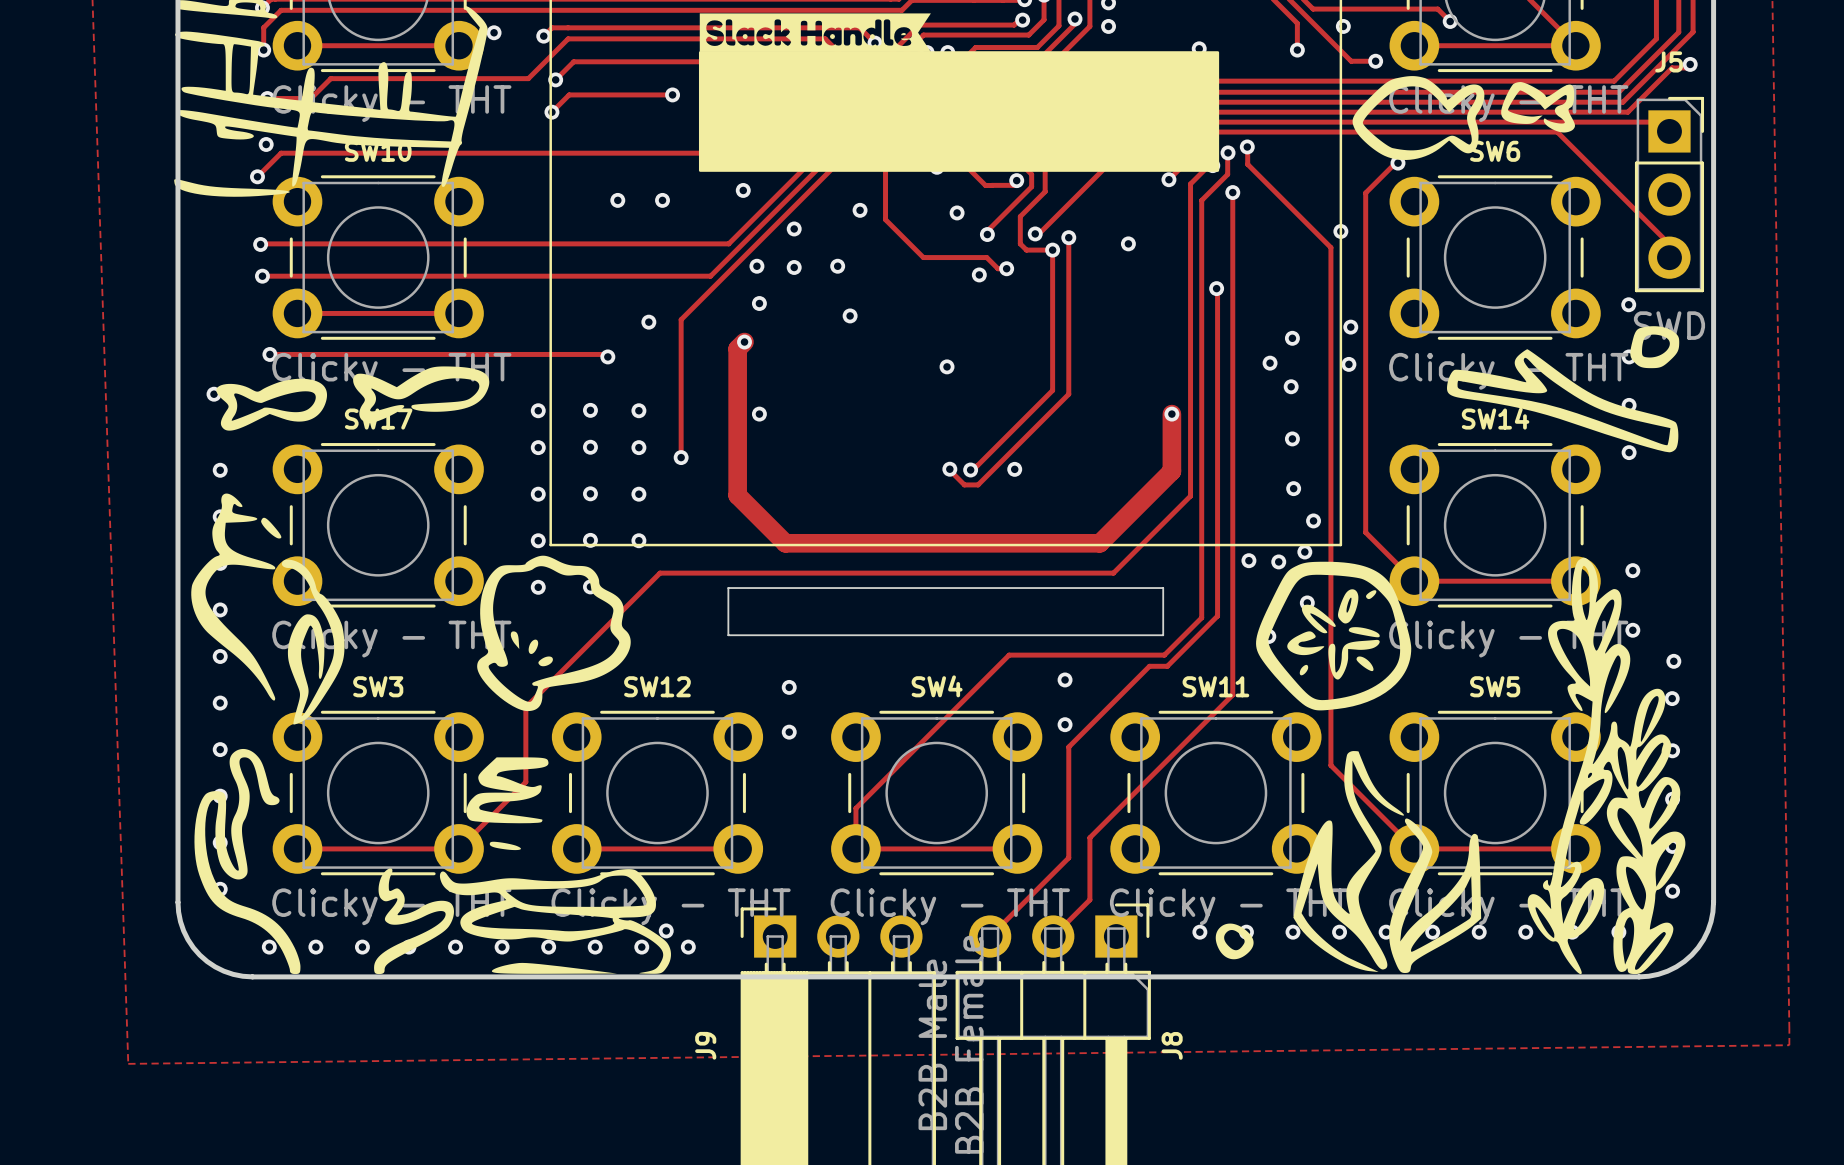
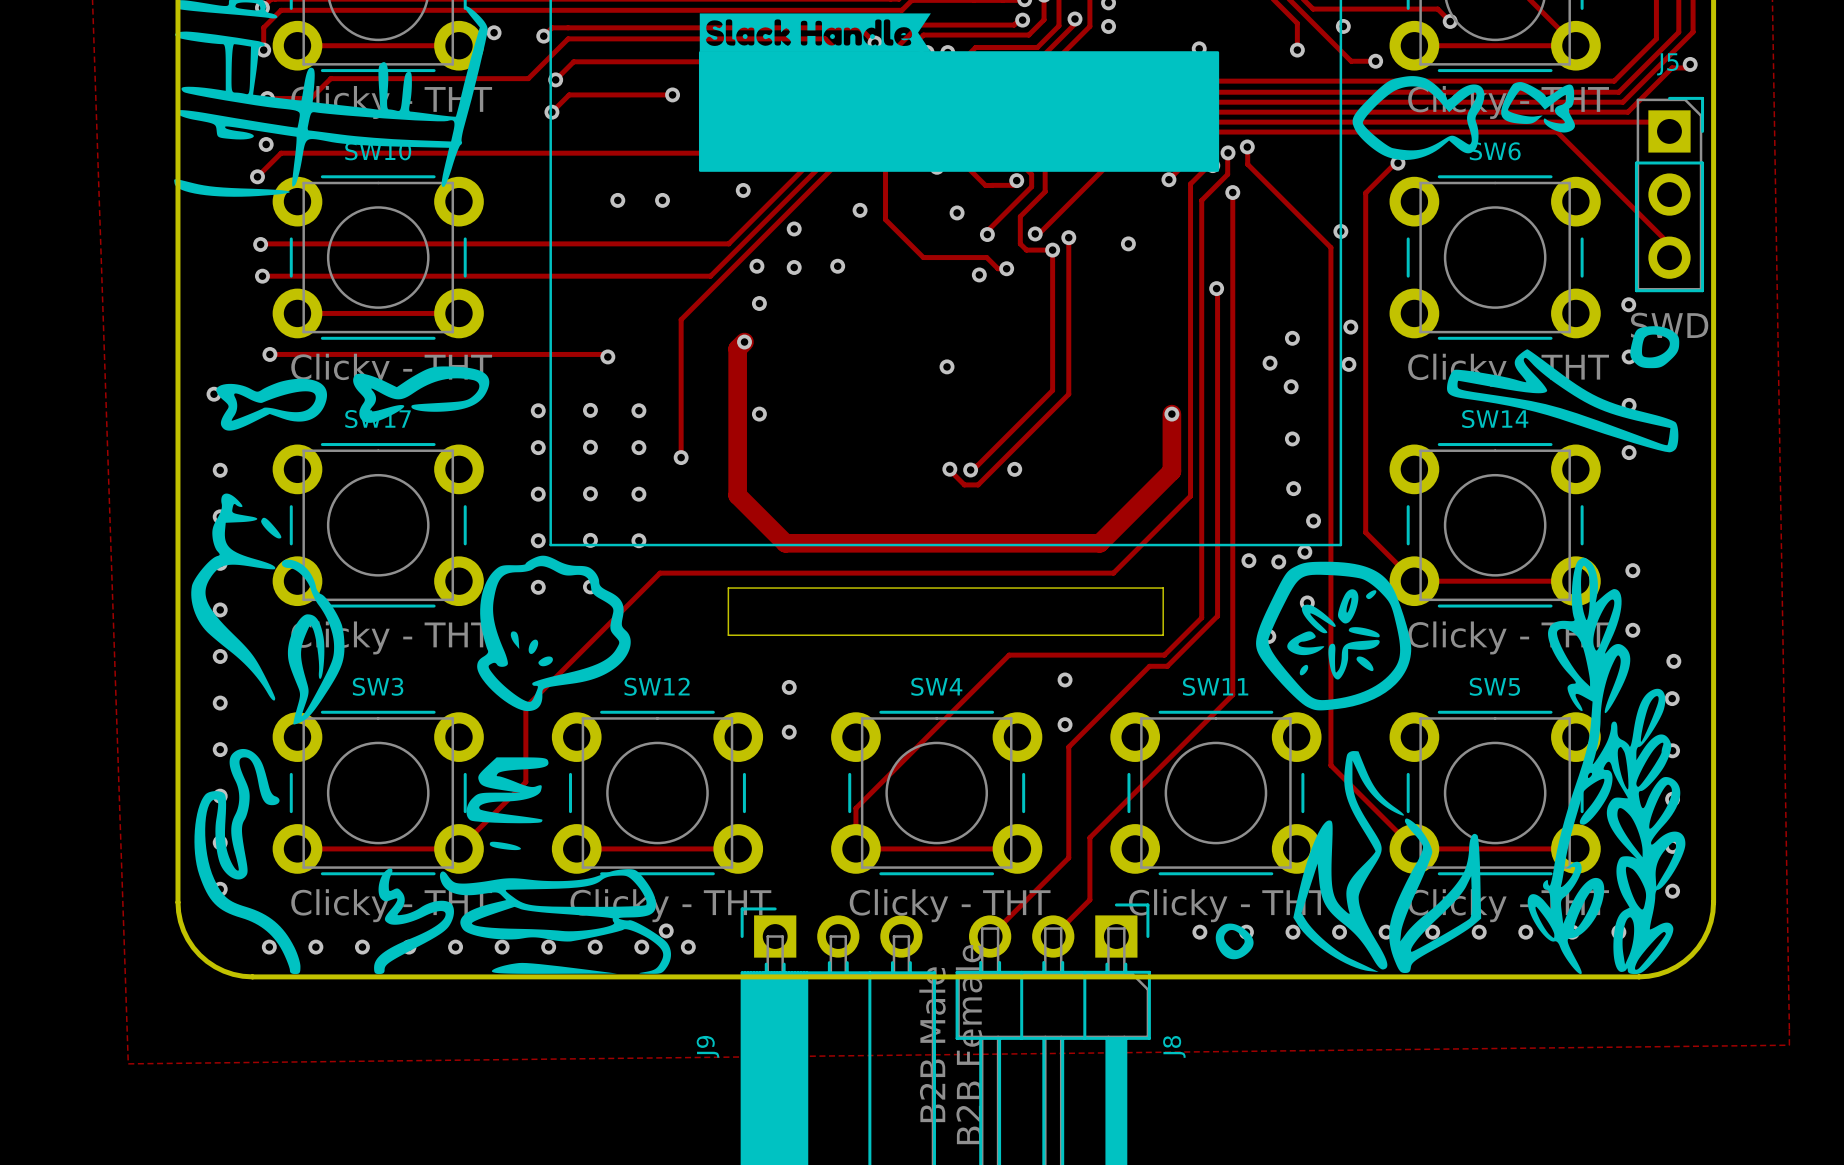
via: (850, 315) -> none
via: (648, 322) -> none

